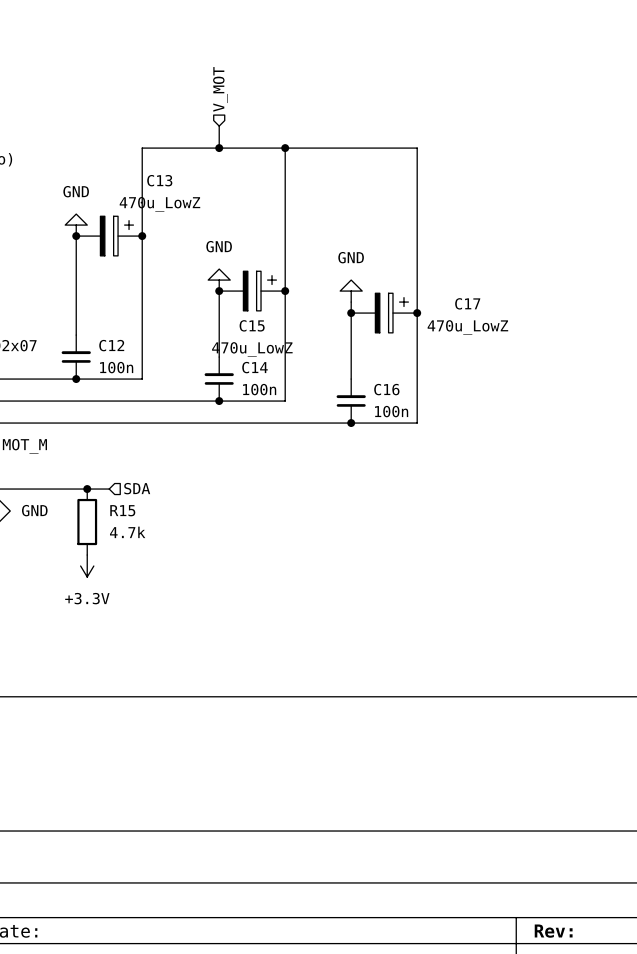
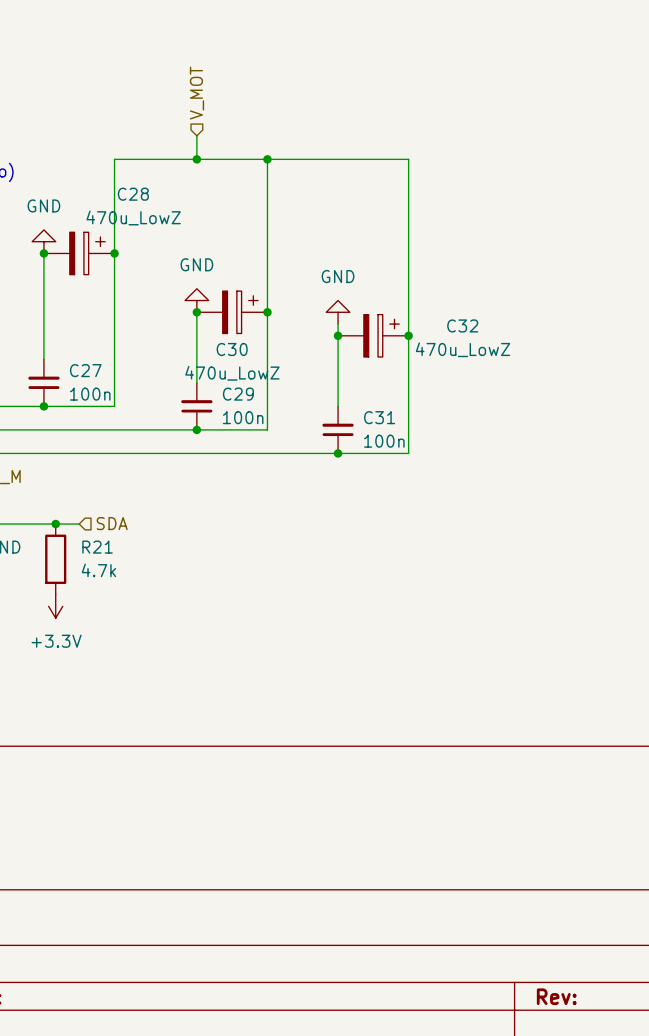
C13 name: C13 (159, 180) -> C28 (133, 194)
C17 name: C17 (467, 303) -> C32 (462, 325)
C15 name: C15 (252, 325) -> C30 (232, 349)
C12 name: C12 (111, 345) -> C27 (85, 370)
C14 name: C14 (254, 367) -> C29 (238, 394)
C16 name: C16 (386, 389) -> C31 (379, 417)
R15 name: R15 (122, 510) -> R21 (97, 547)

